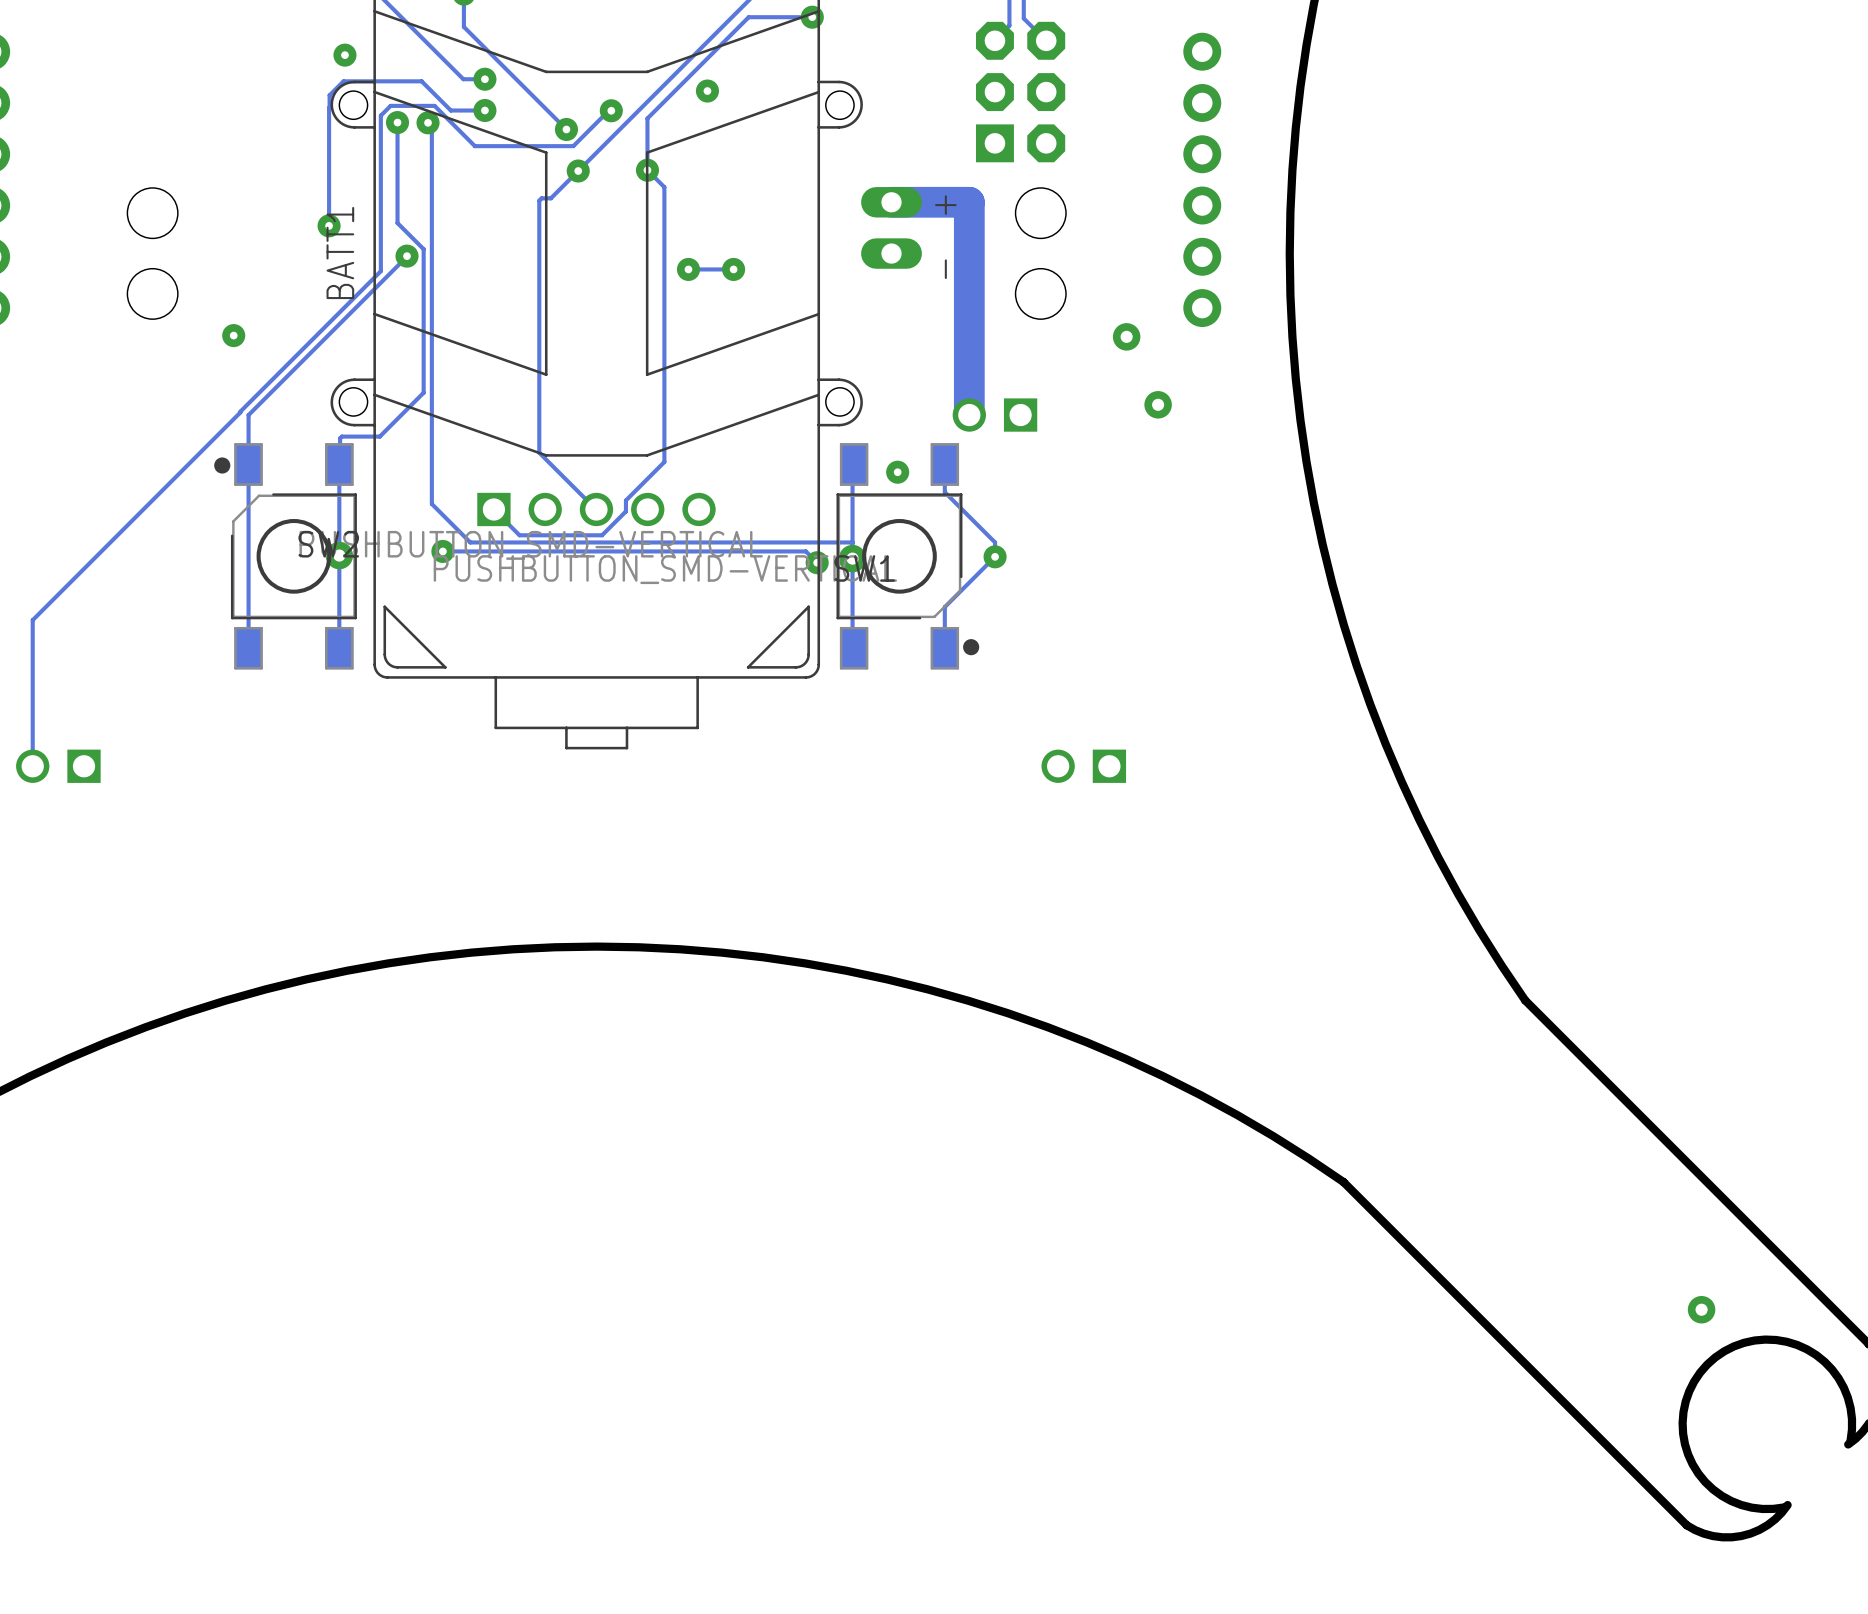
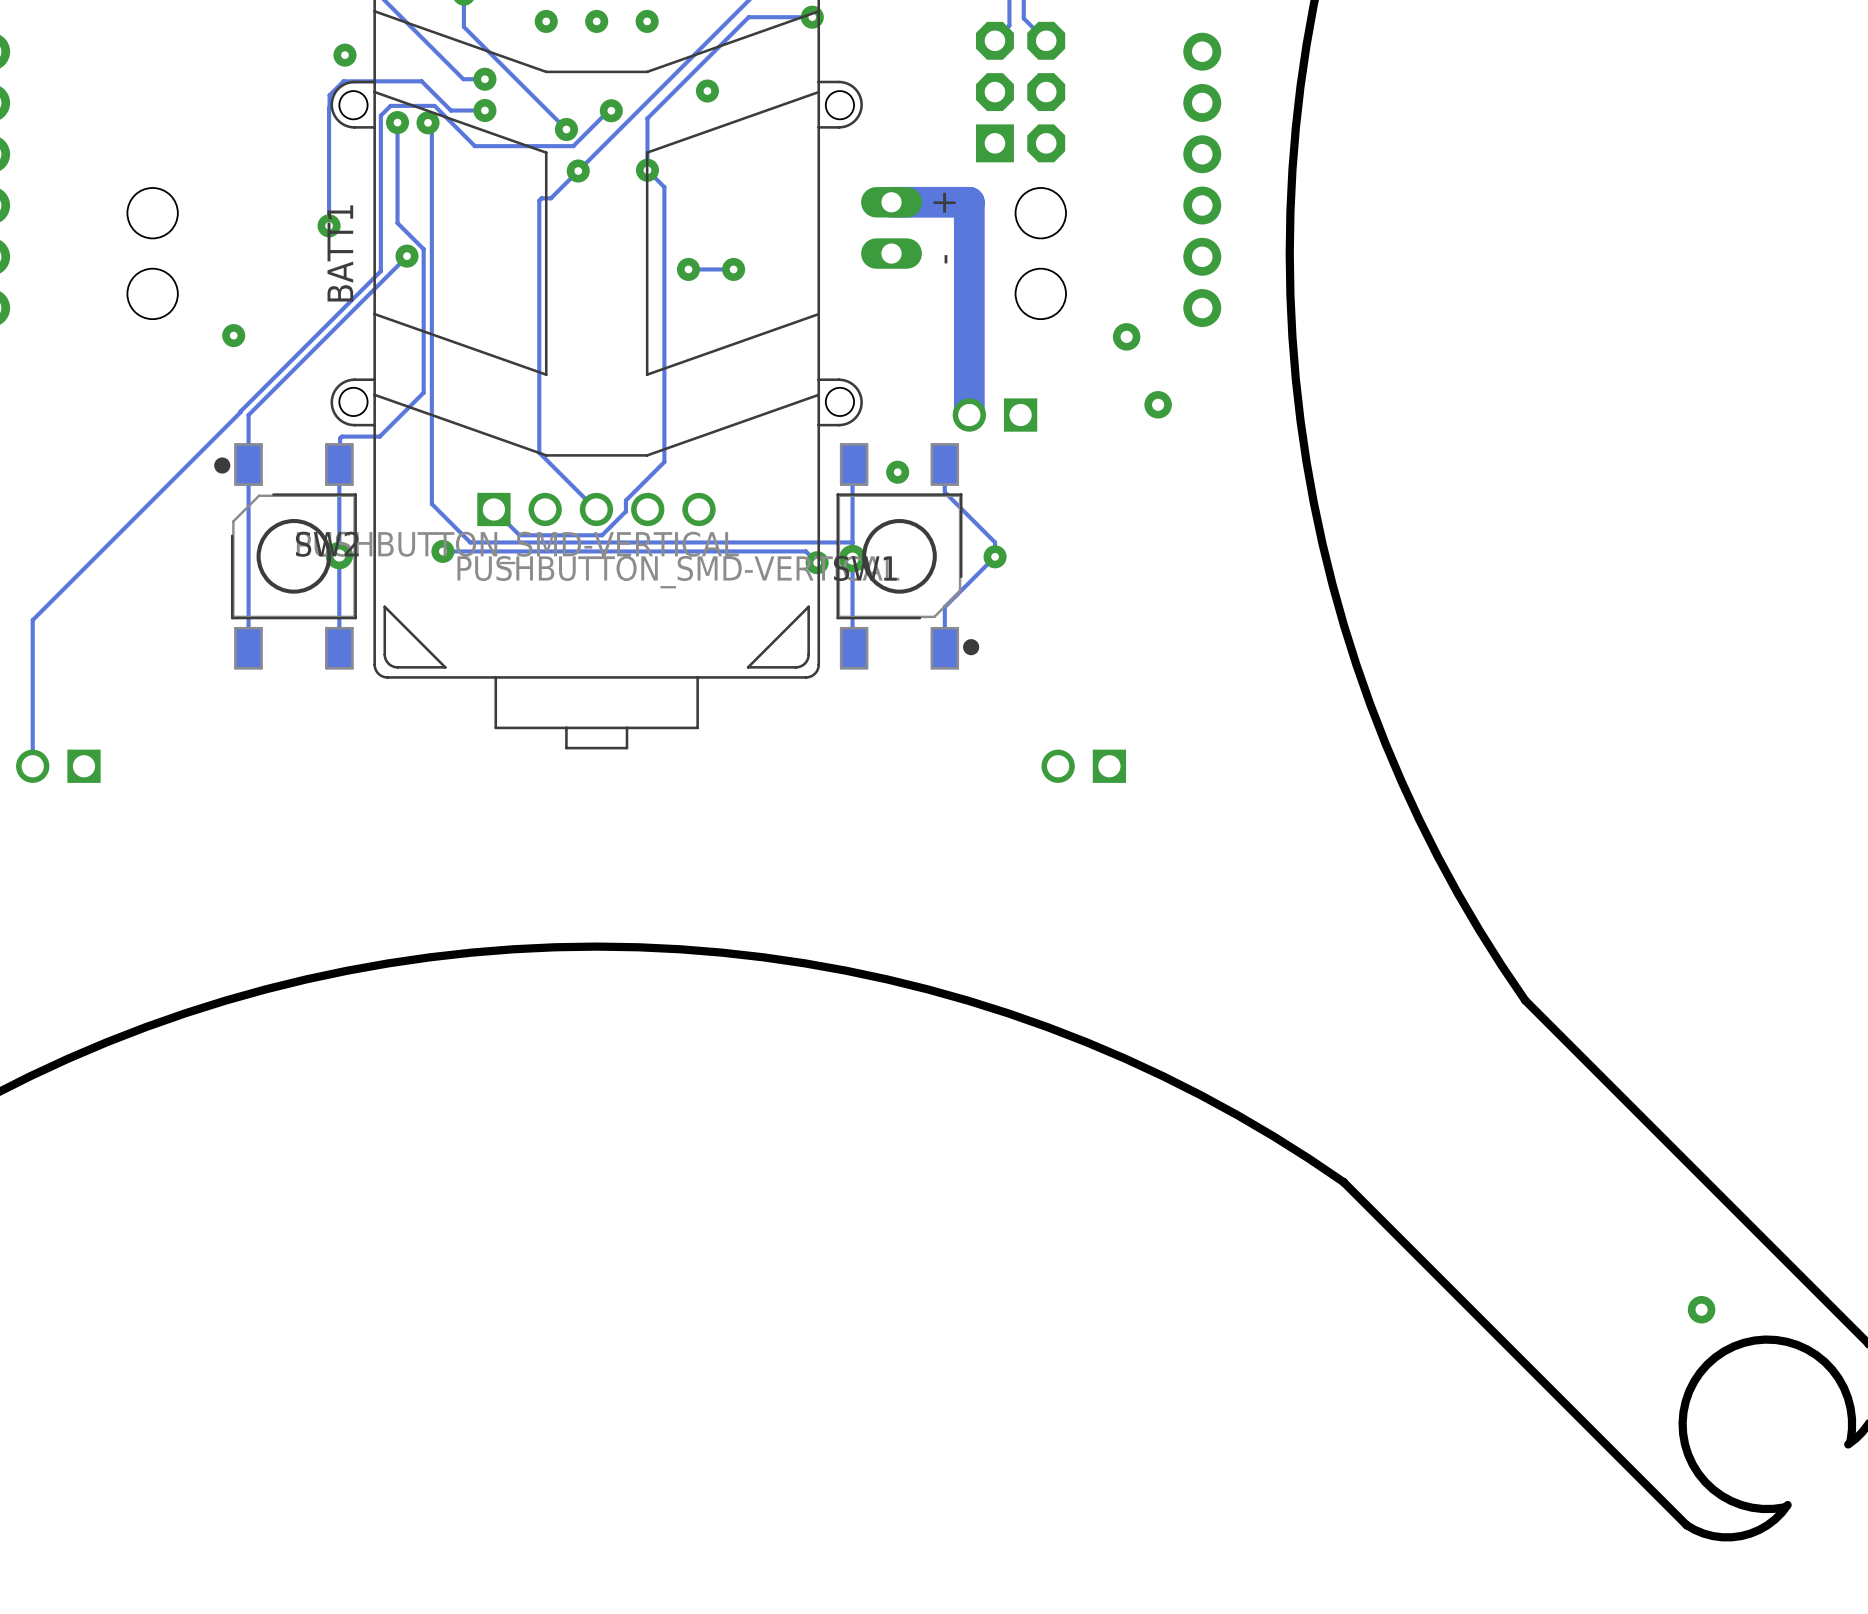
via: none -> (546, 21)
via: none -> (596, 21)
via: none -> (647, 21)

